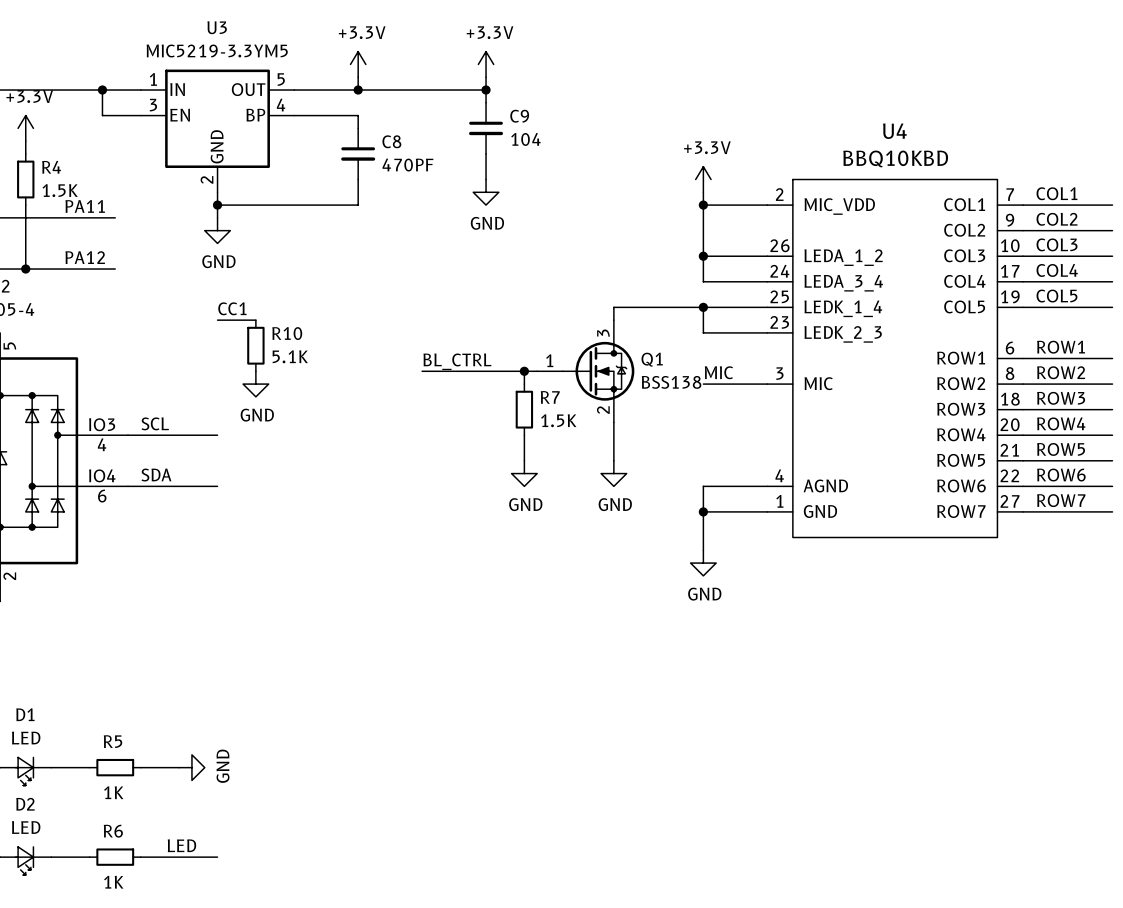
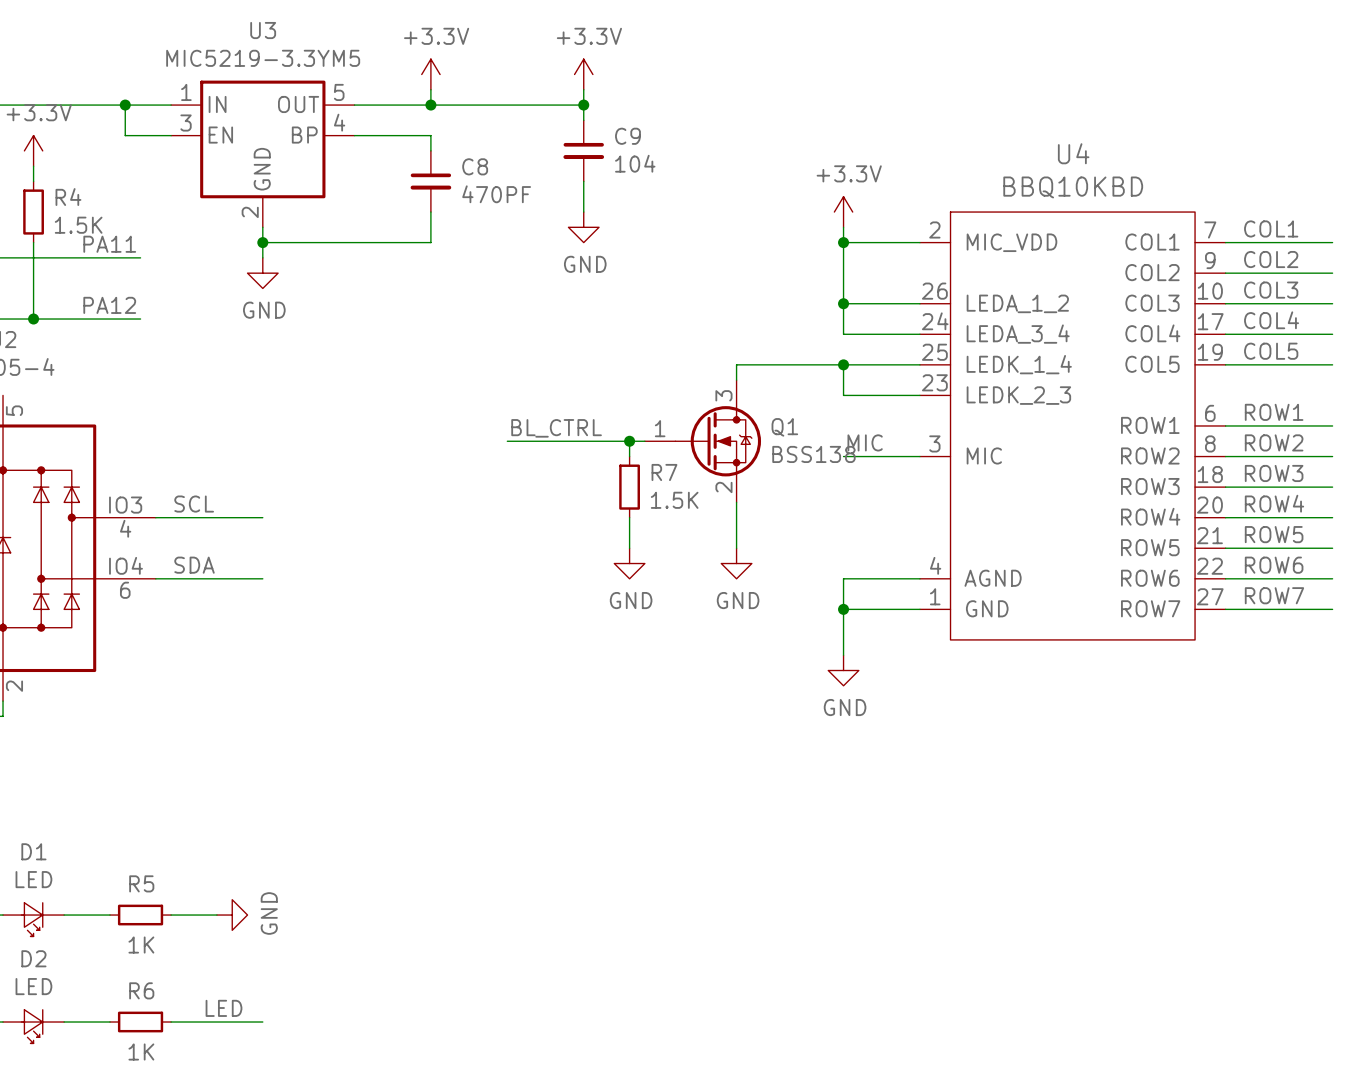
label: CC1 (232, 308) -> none
wire: (217, 320) (255, 320) -> none
R10: 5.1K (255, 345) -> none
power symbol: GND (255, 384) -> none

